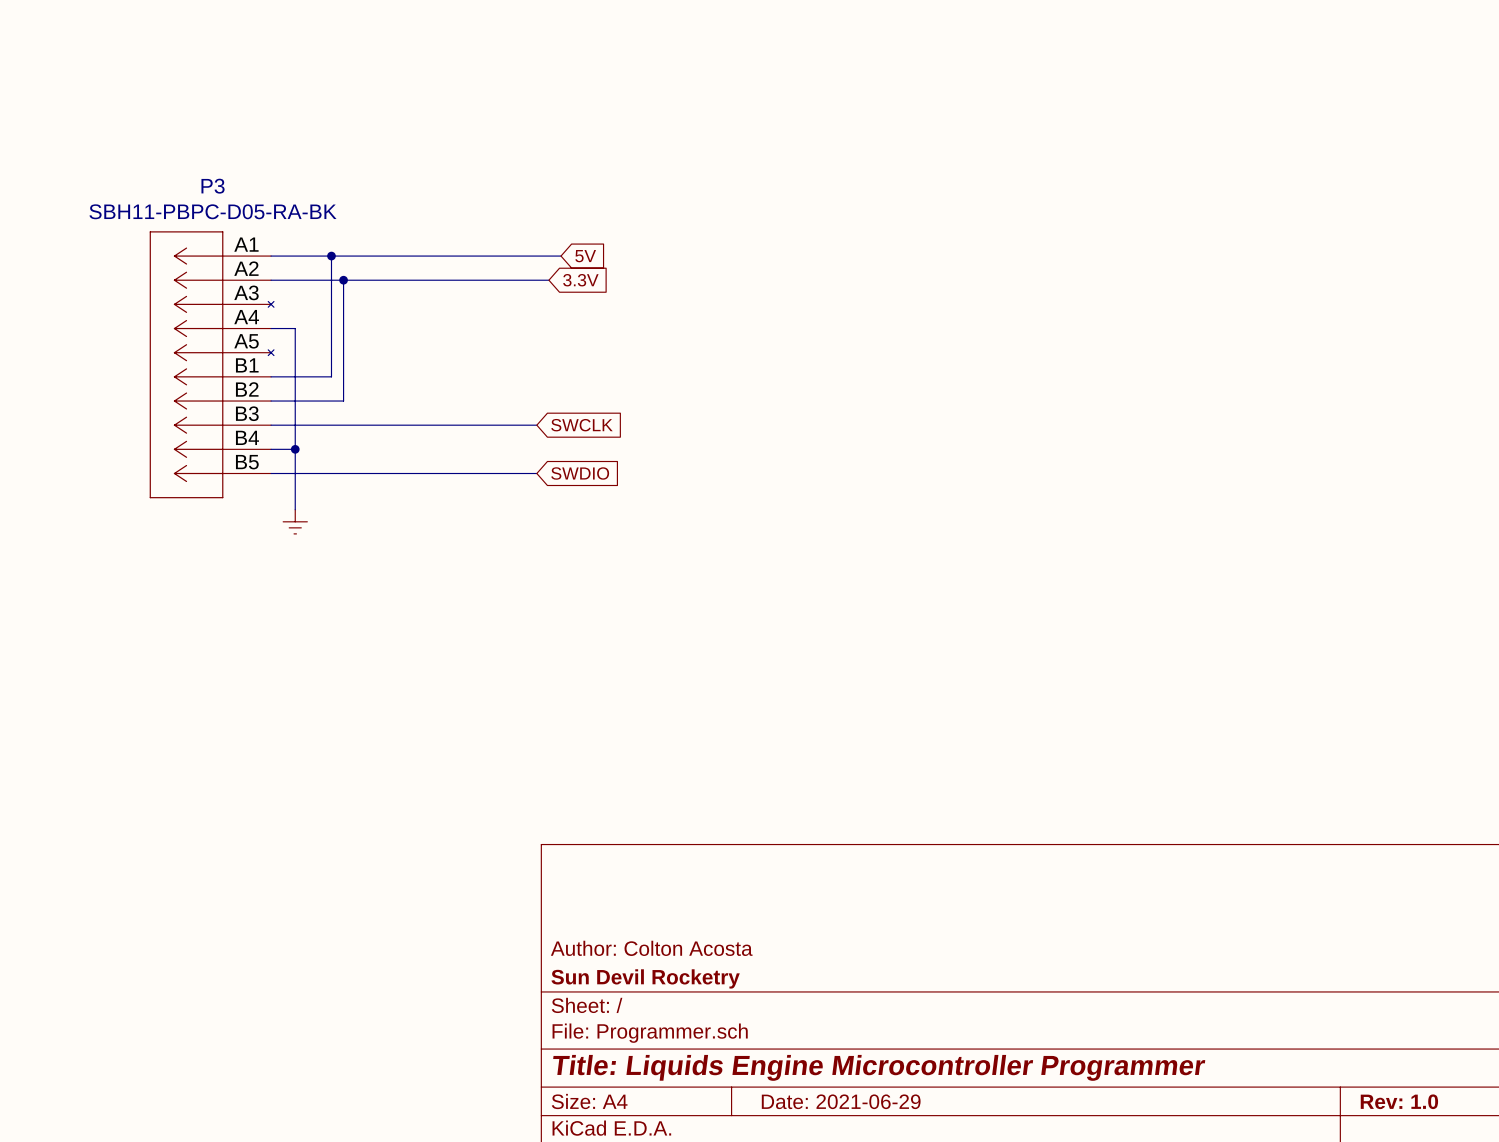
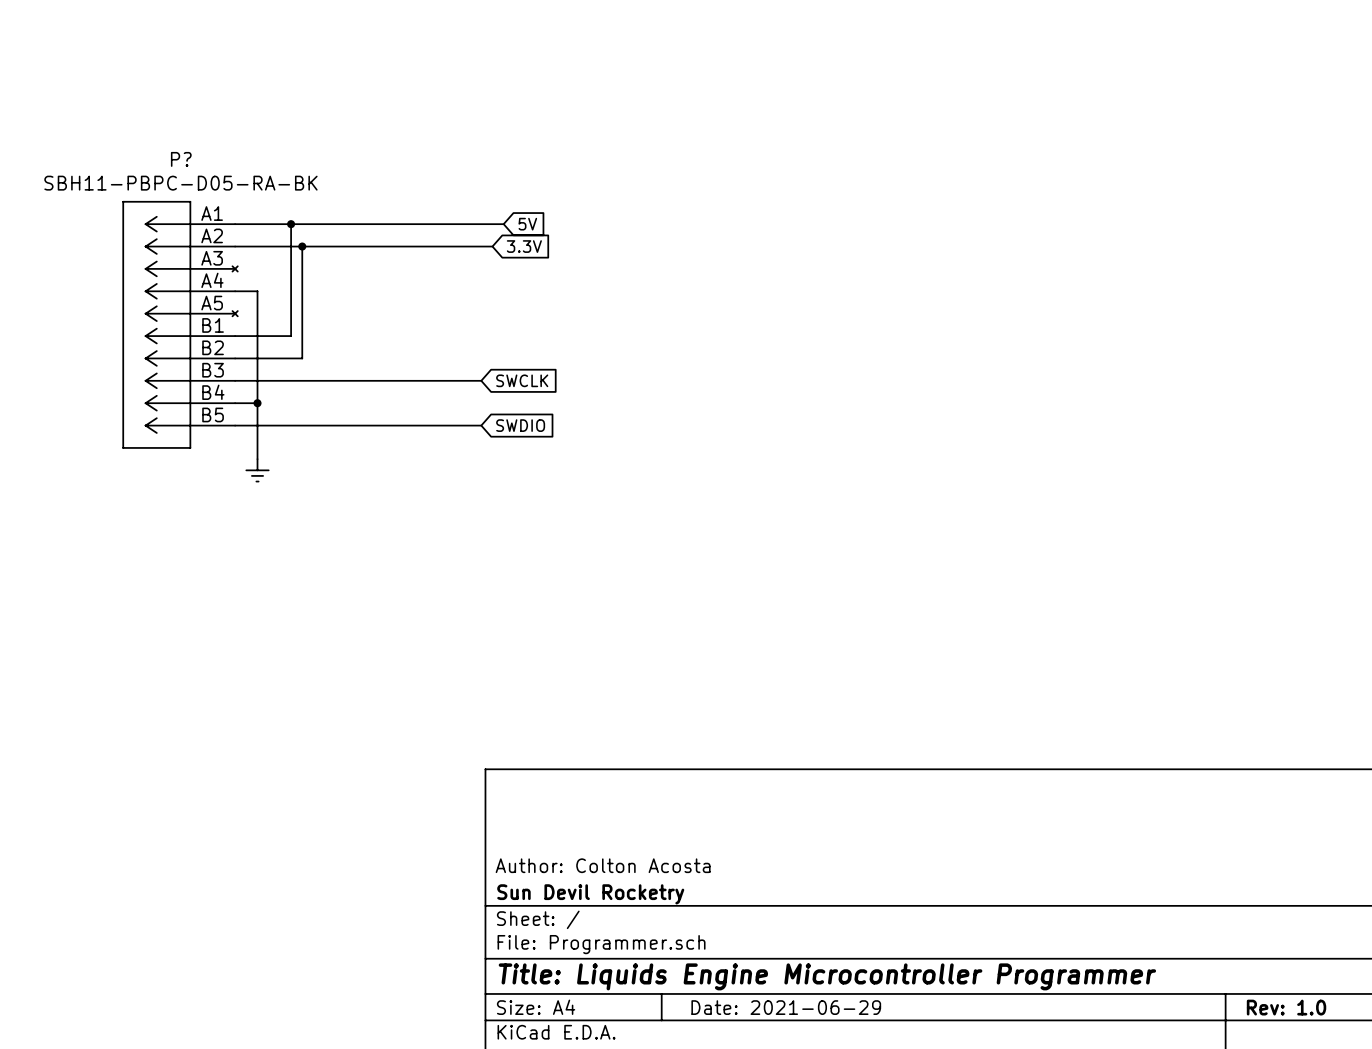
P3 name: P3 (213, 186) -> P? (181, 159)

